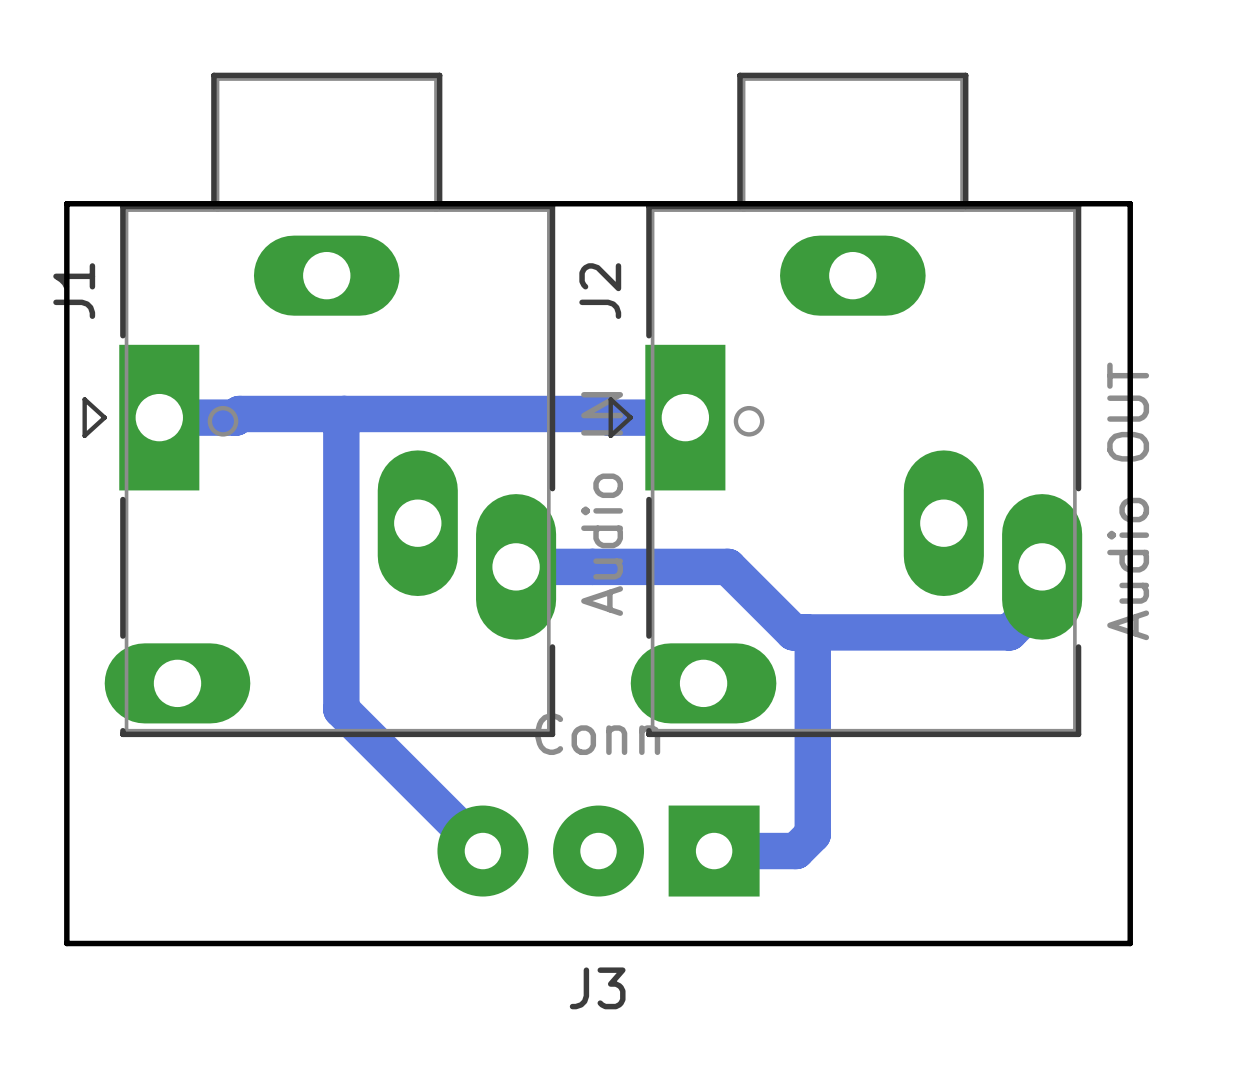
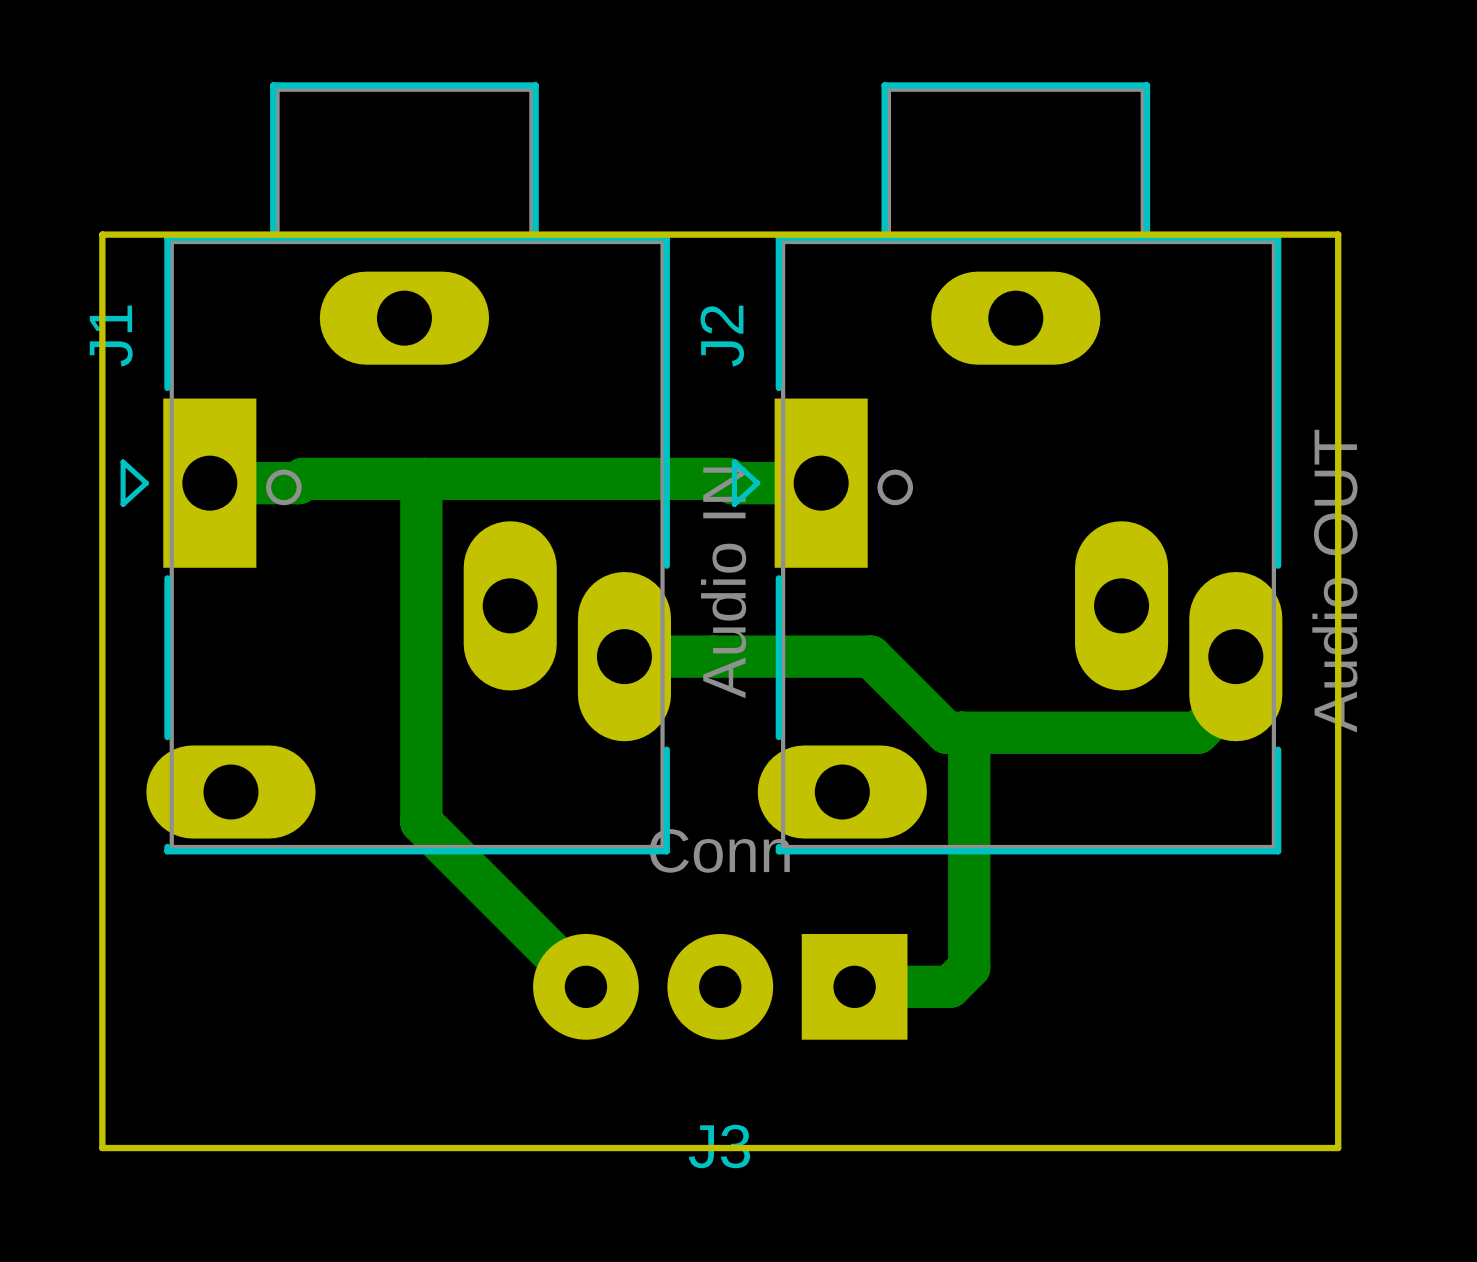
board edge: (66, 943) (1130, 943) -> (102, 1094) (102, 1148) (1338, 1148) (1338, 1094)

